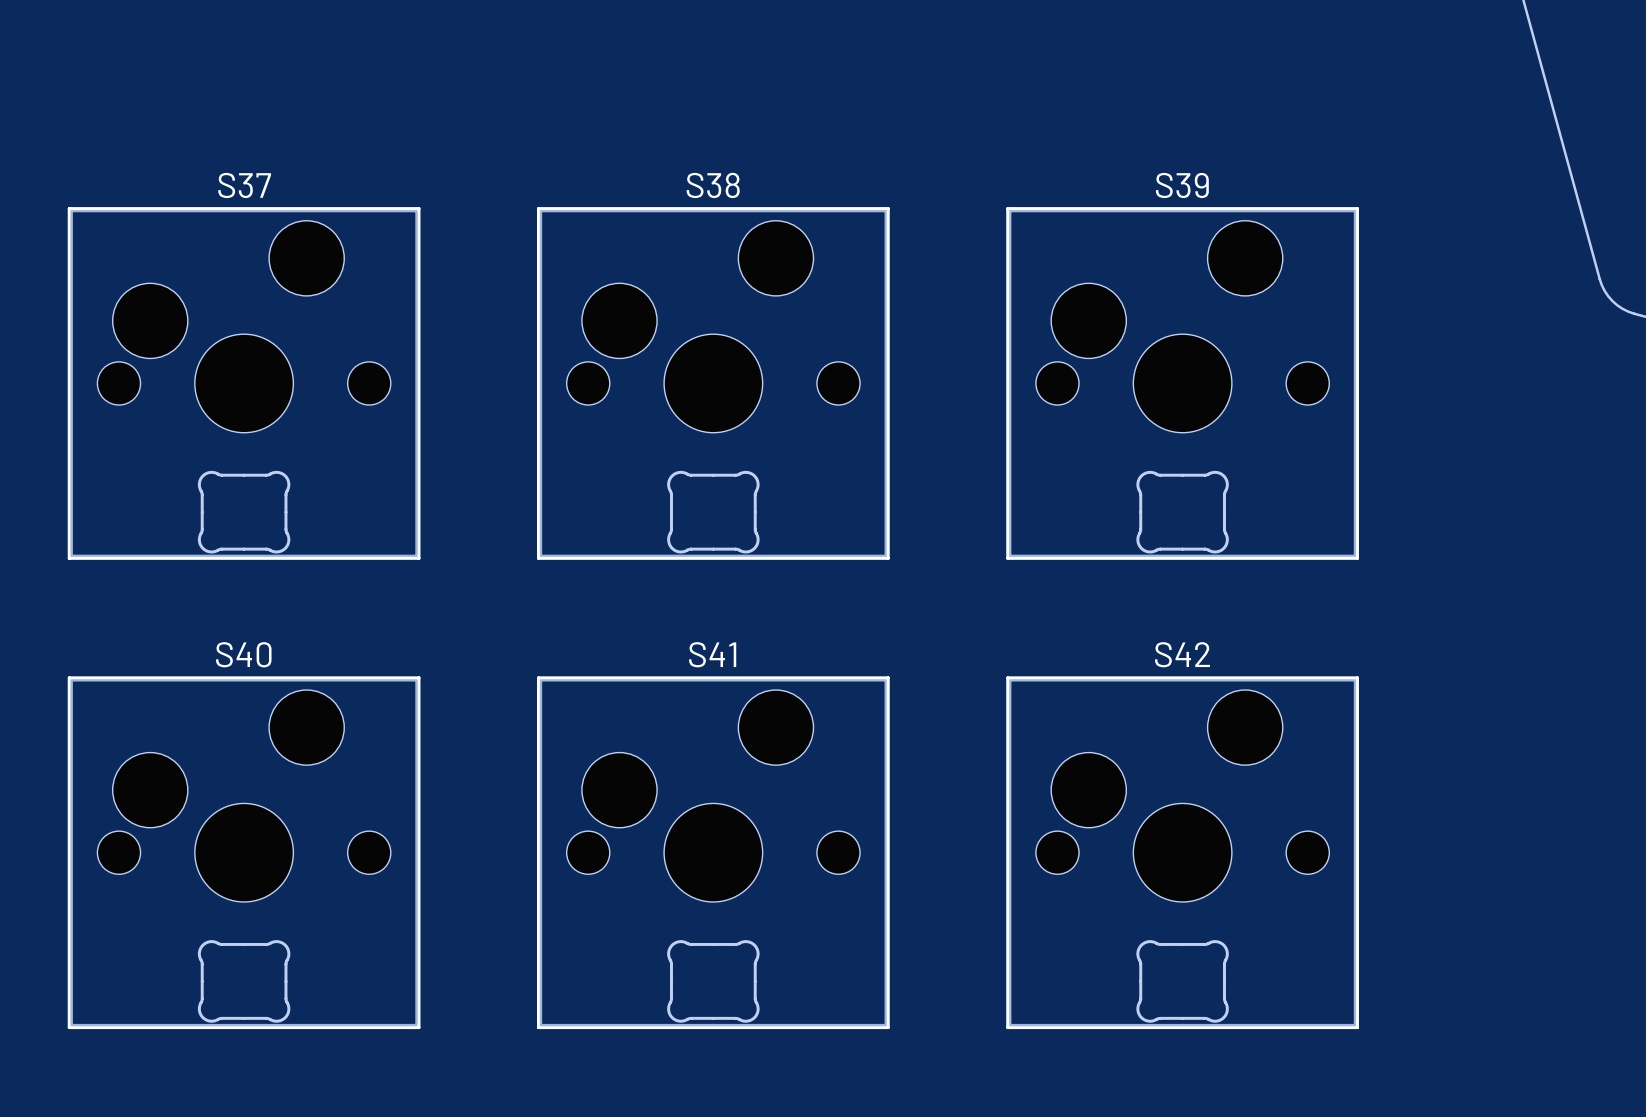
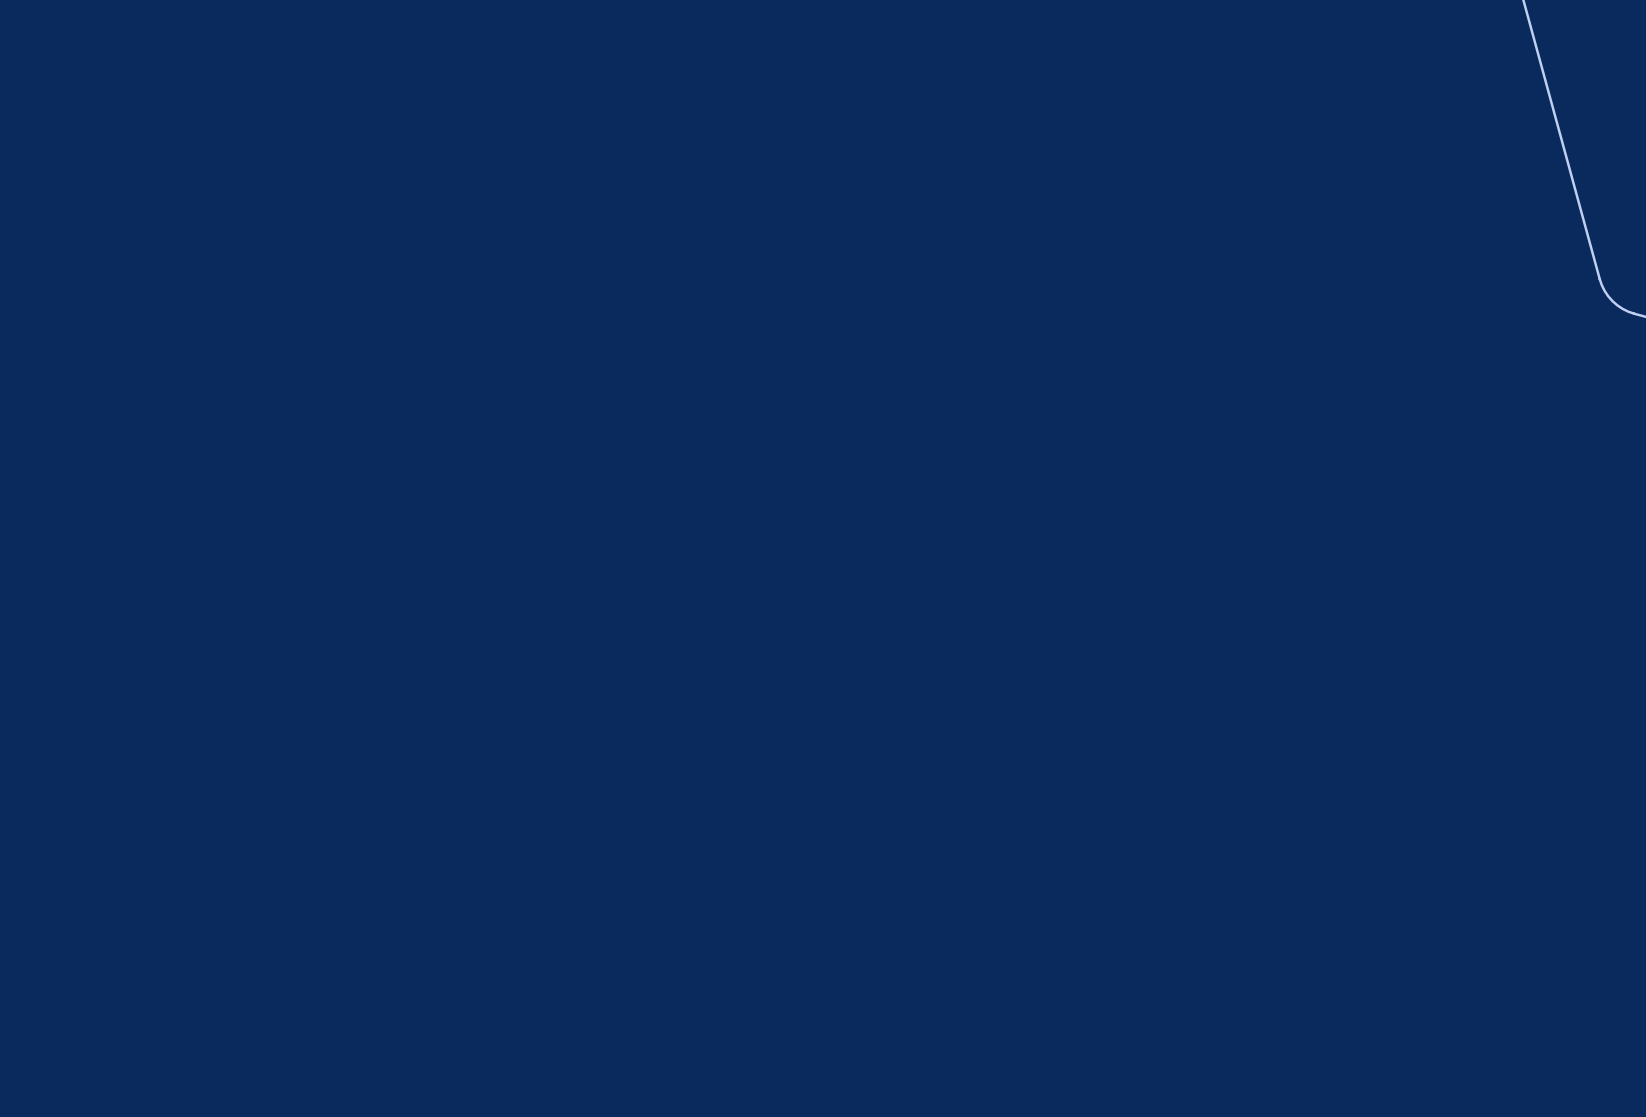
S37: (244, 383) -> none
S38: (713, 383) -> none
S39: (1182, 383) -> none
part: (244, 512) -> none
part: (713, 512) -> none
part: (1182, 512) -> none
S40: (244, 852) -> none
S41: (713, 852) -> none
S42: (1182, 852) -> none
part: (244, 981) -> none
part: (713, 981) -> none
part: (1182, 981) -> none

